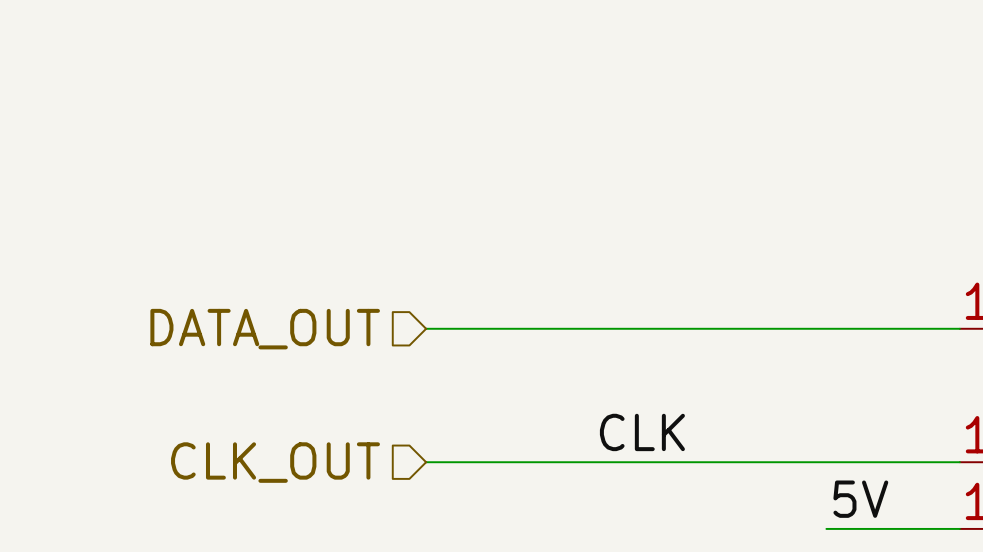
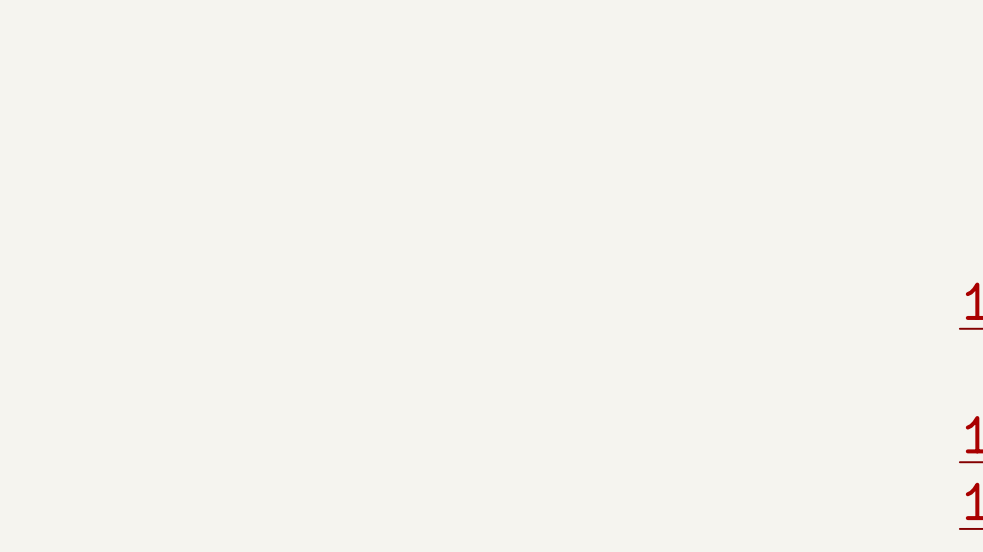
wire: (426, 328) (959, 328) -> none
hierarchical label: DATA_OUT (265, 329) -> none
label: CLK (642, 432) -> none
hierarchical label: CLK_OUT (275, 462) -> none
wire: (426, 462) (959, 462) -> none
label: 5V (860, 499) -> none
wire: (826, 528) (959, 528) -> none

